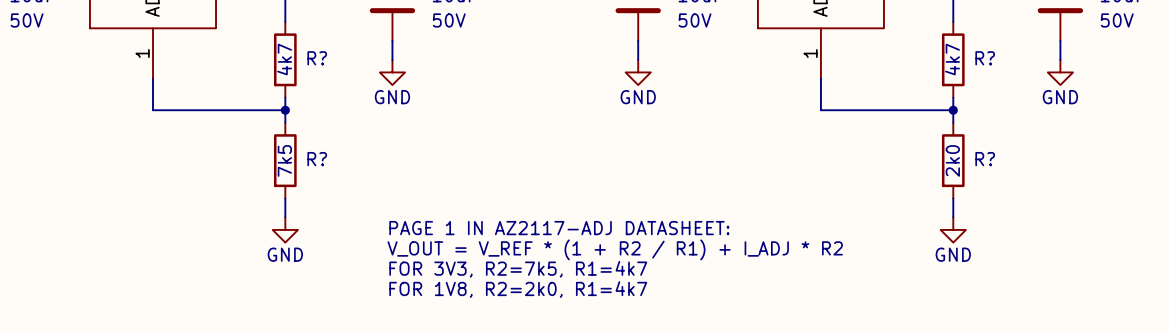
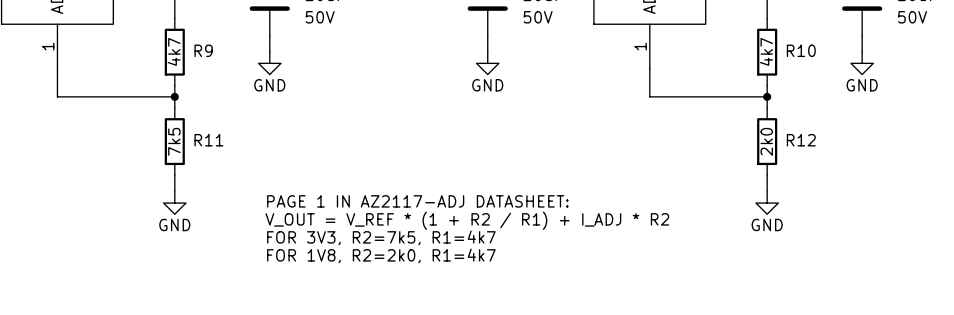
R? name: R? (317, 58) -> R9 (203, 50)
R? name: R? (985, 58) -> R10 (801, 50)
R? name: R? (317, 159) -> R11 (208, 140)
R? name: R? (985, 159) -> R12 (801, 140)

